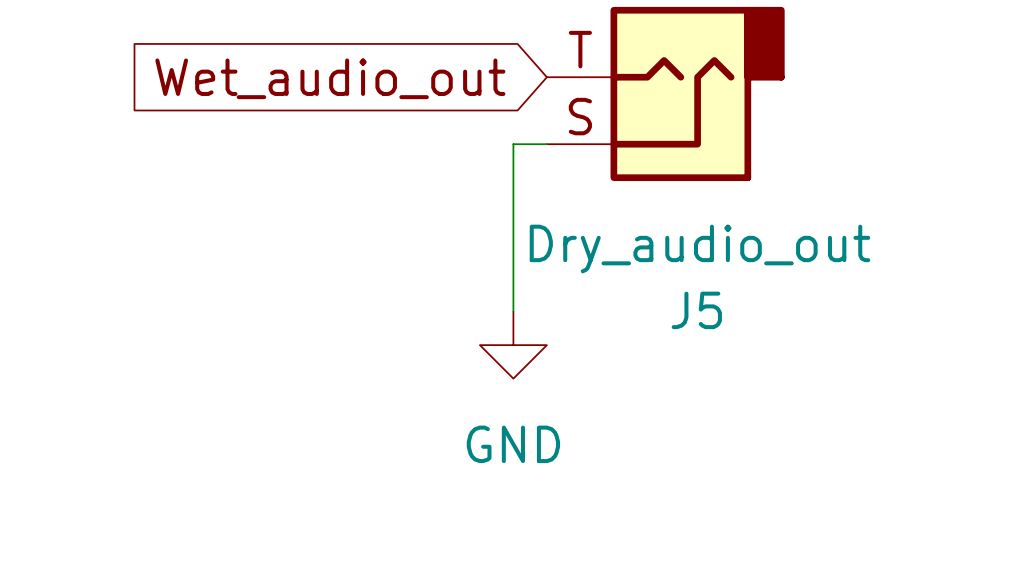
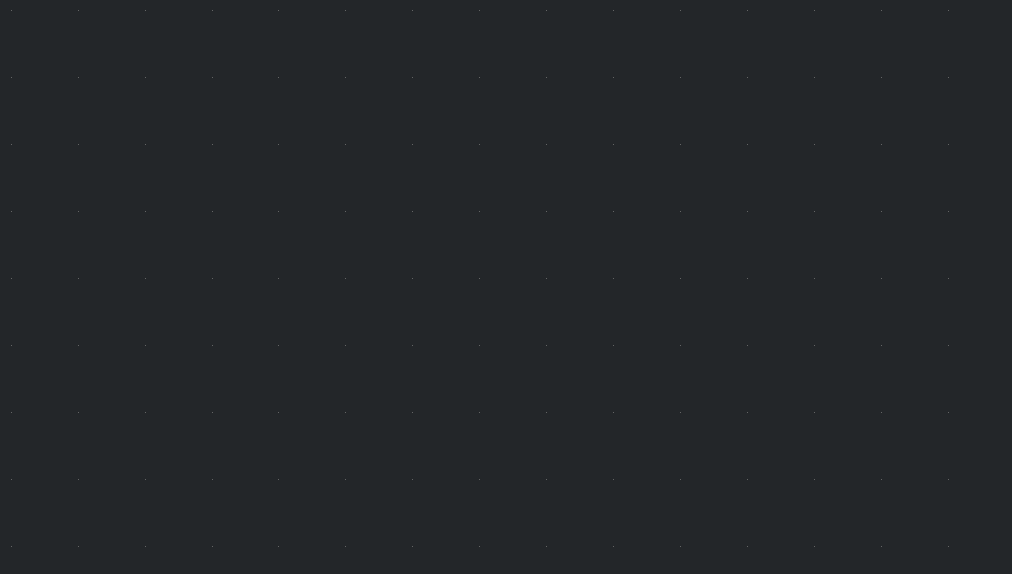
global label: Wet_audio_out (330, 78) -> none
J5: Dry_audio_out (665, 93) -> none
wire: (546, 144) (513, 144) (513, 311) -> none
power symbol: GND (513, 345) -> none

